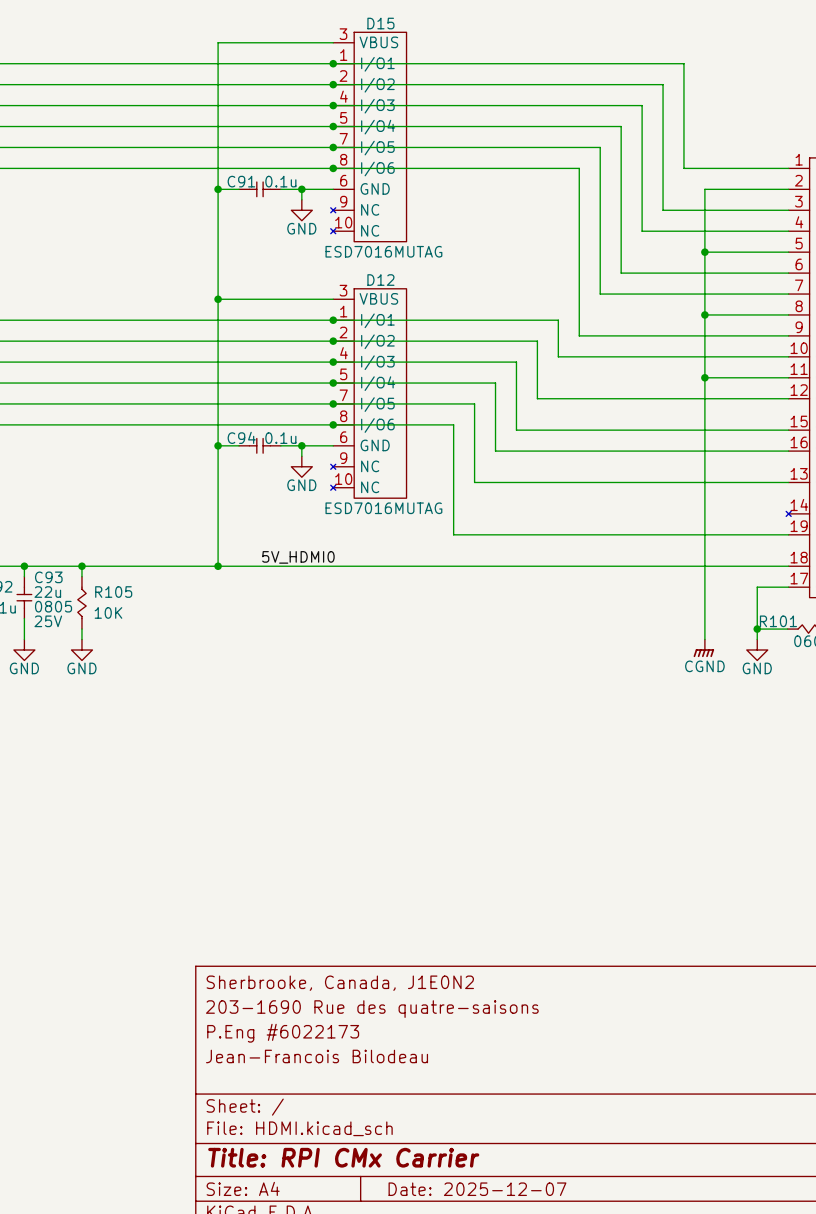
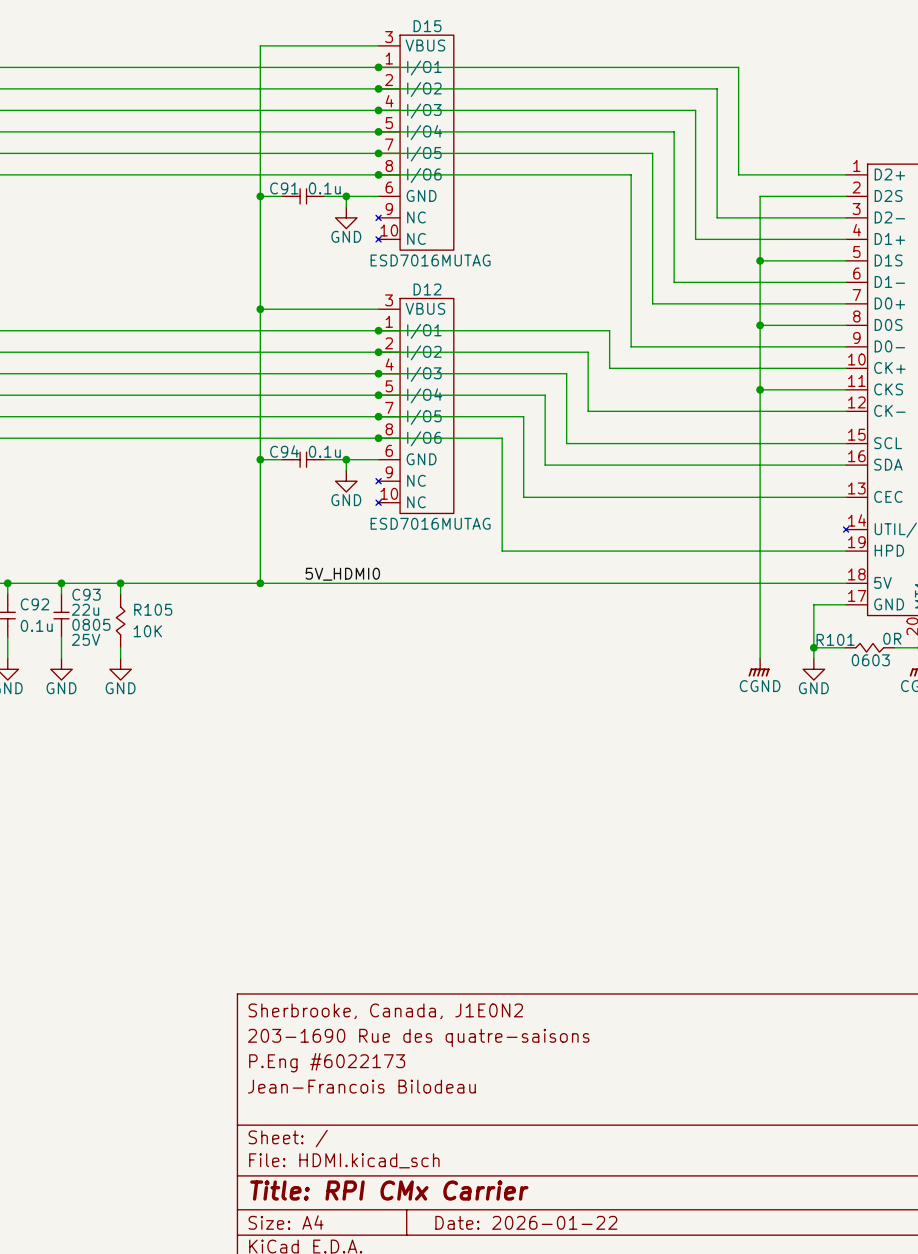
title block: Date: 2025-12-07 (477, 1189) -> Date: 2026-01-22 (526, 1222)

